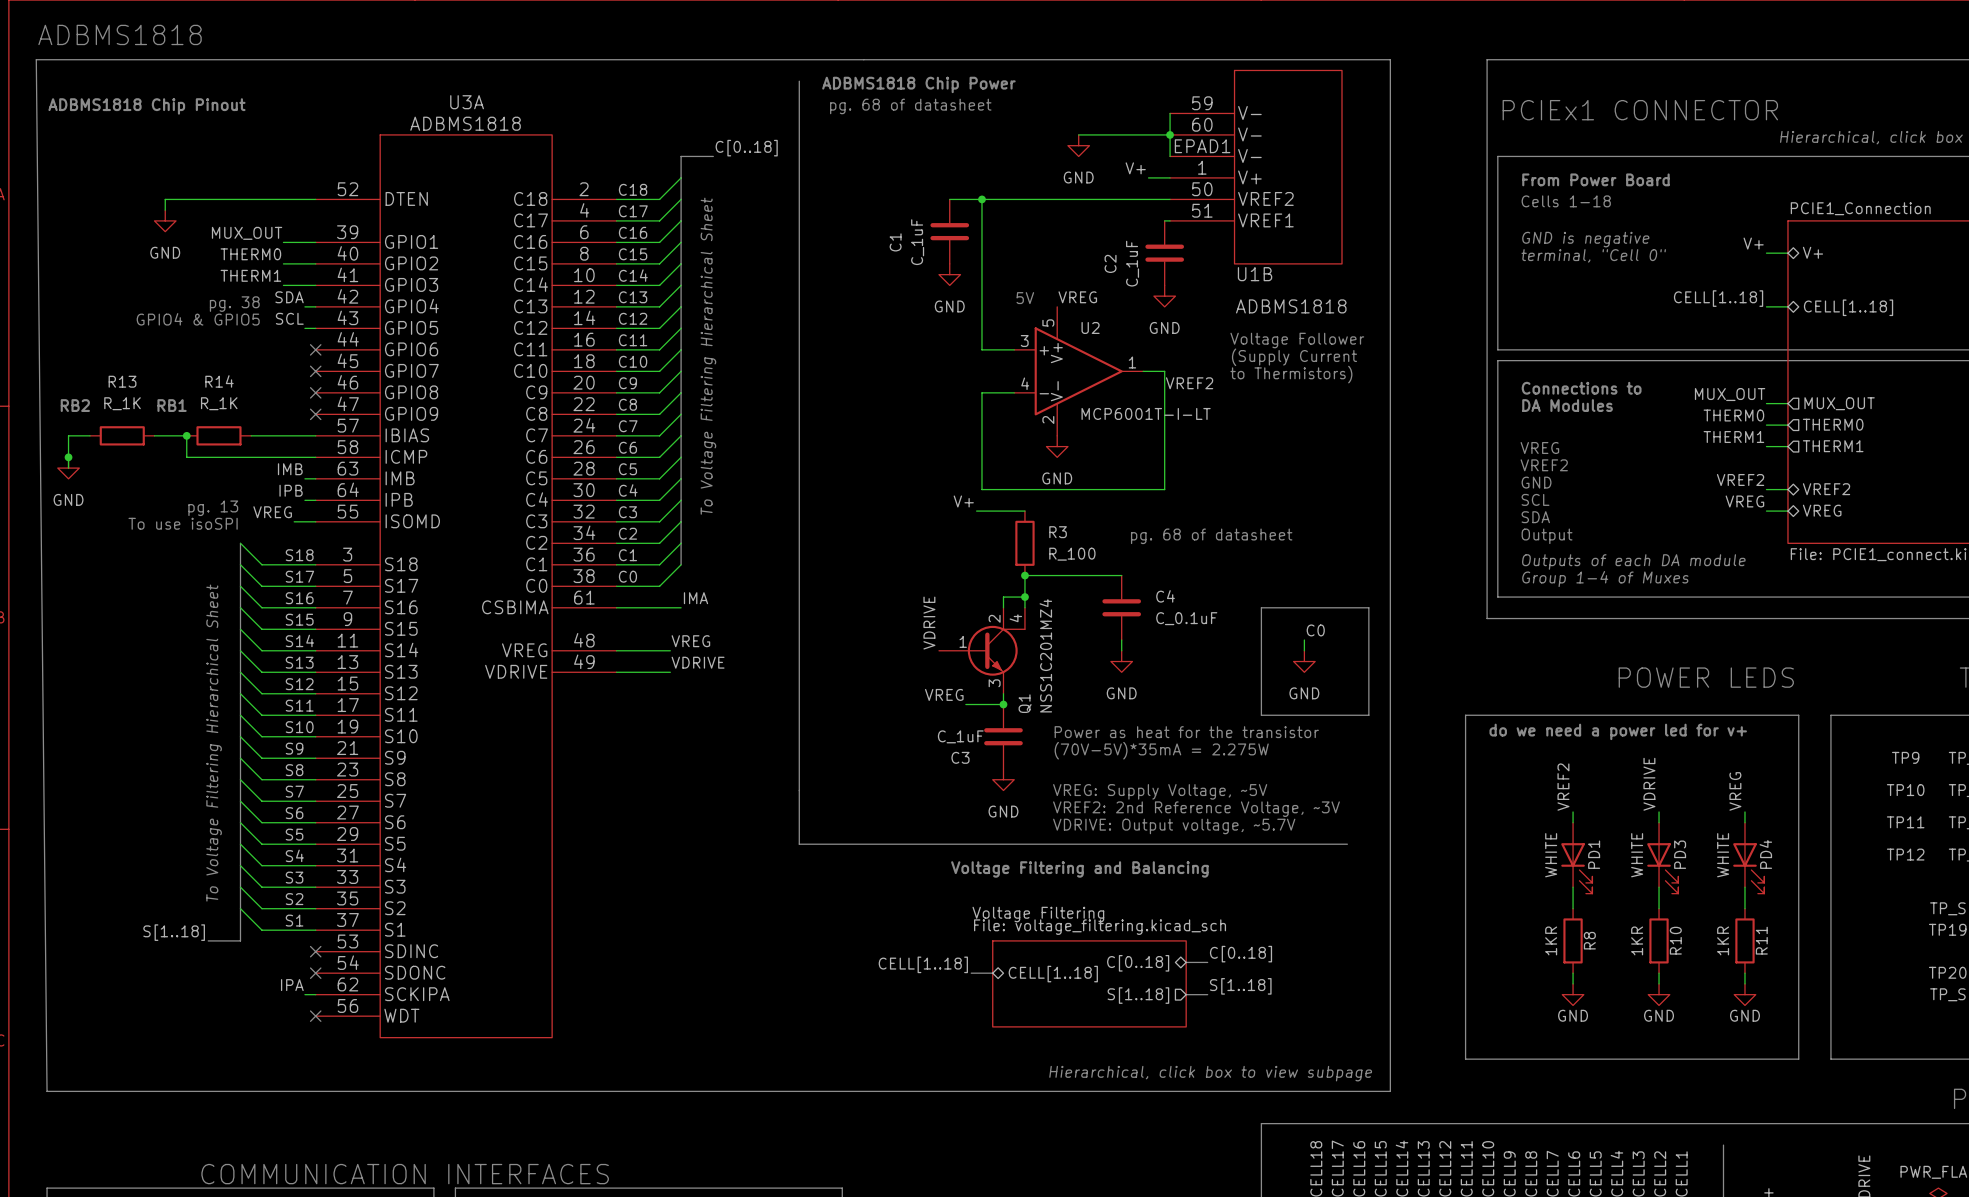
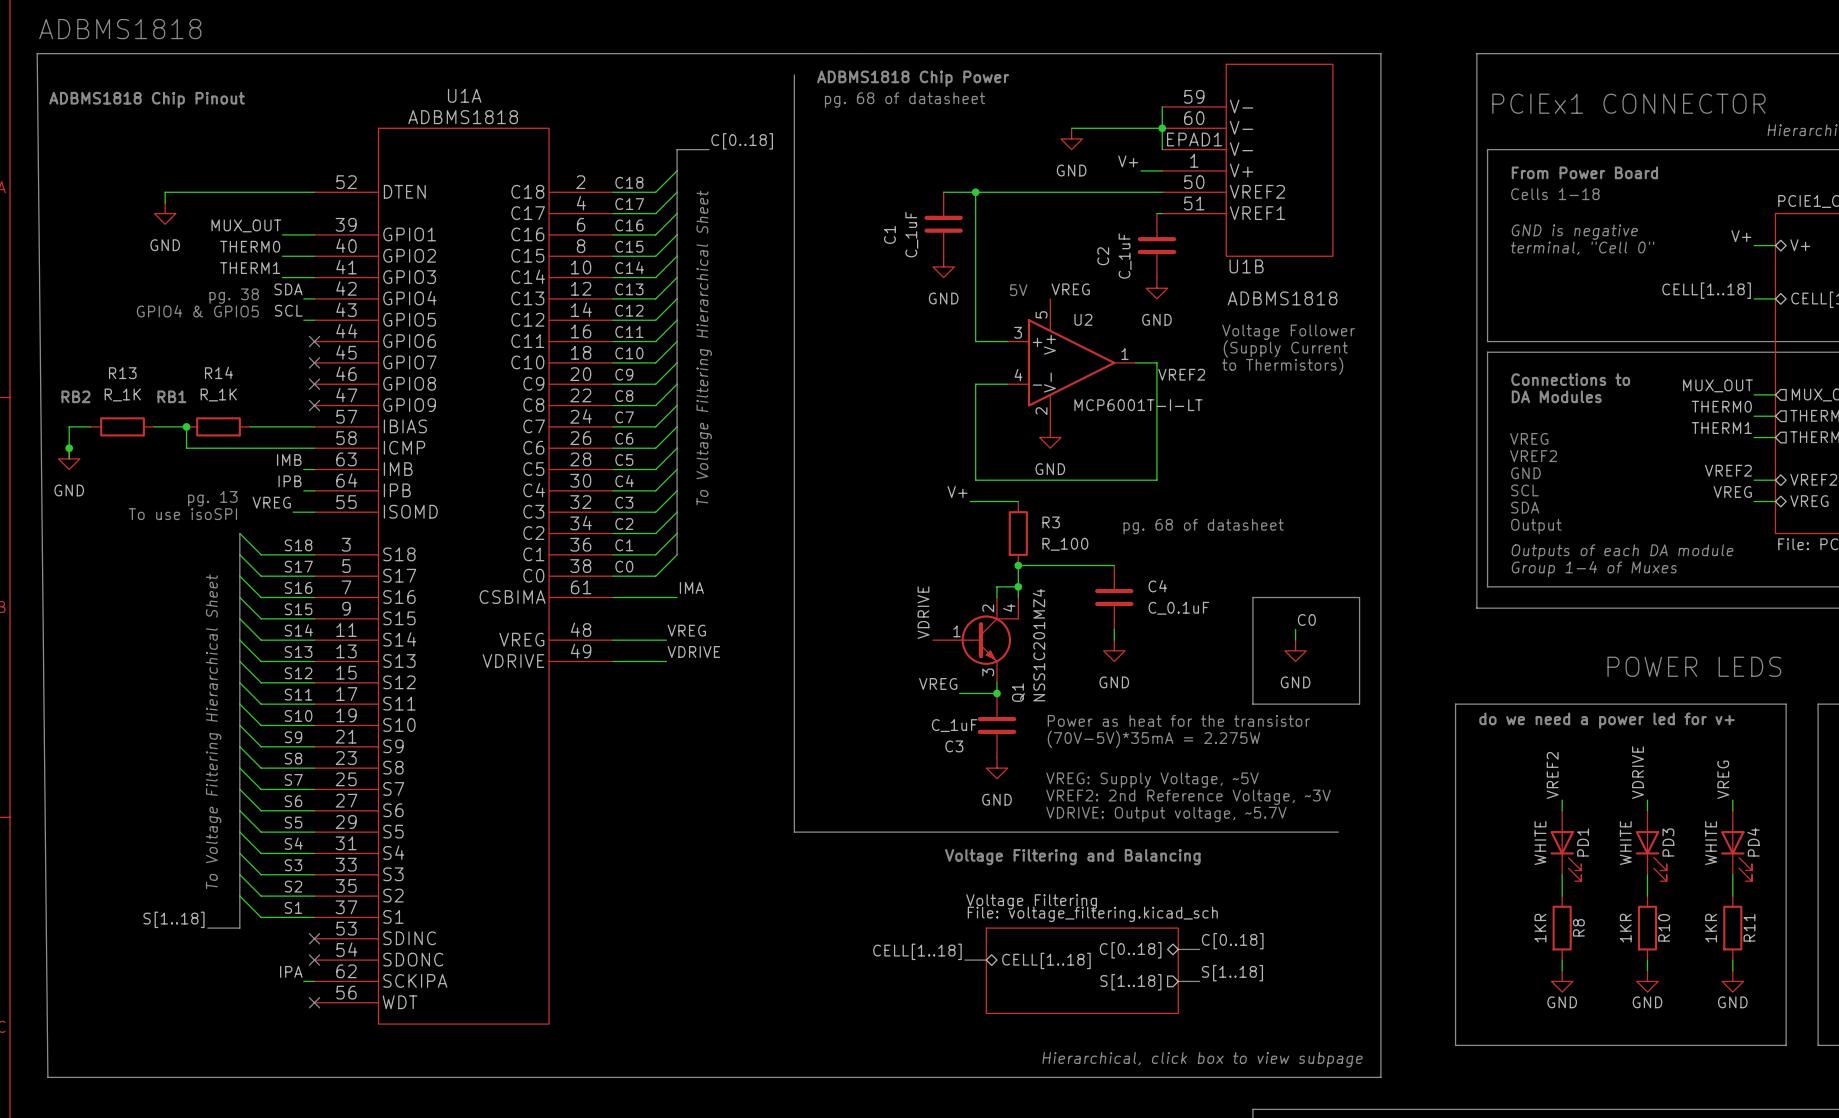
U3A name: U3A (467, 102) -> U1A (464, 95)

